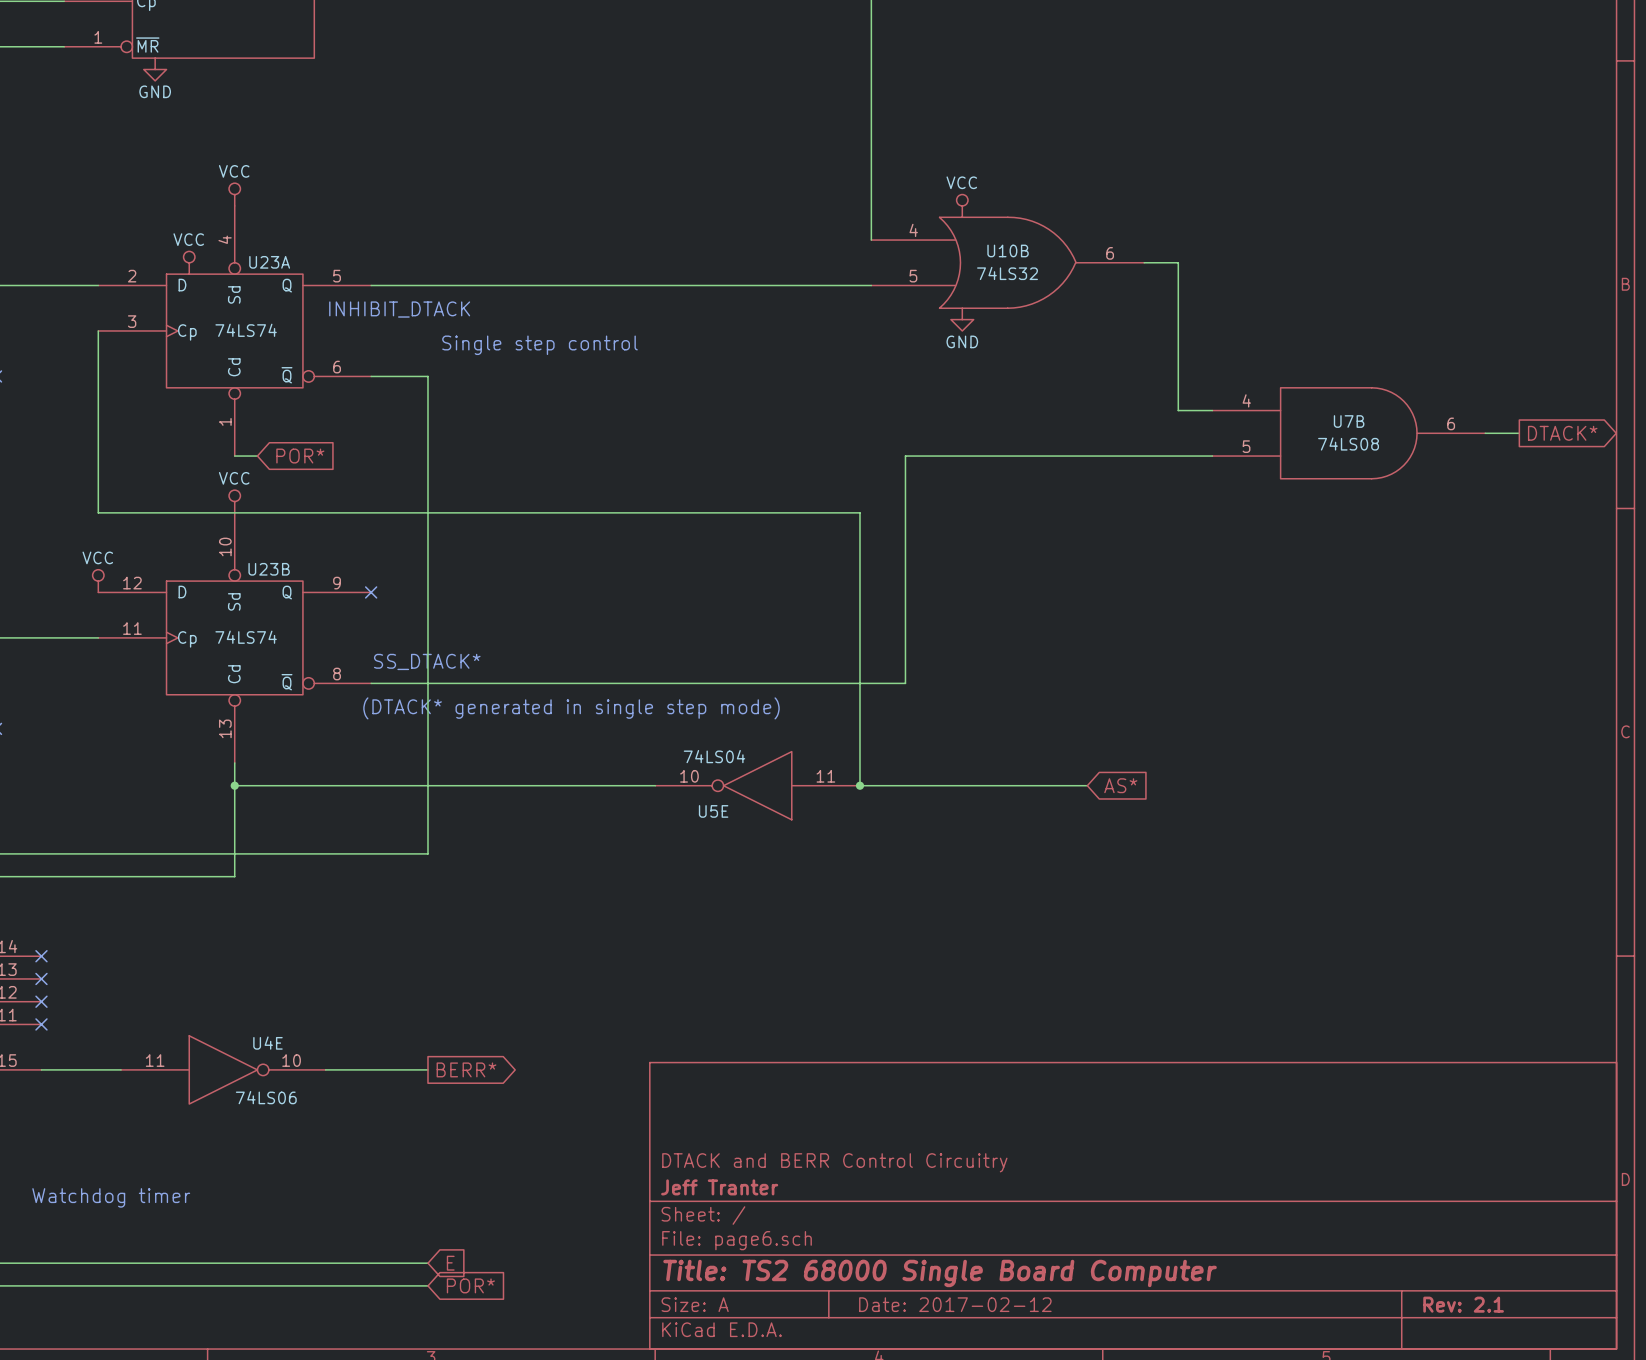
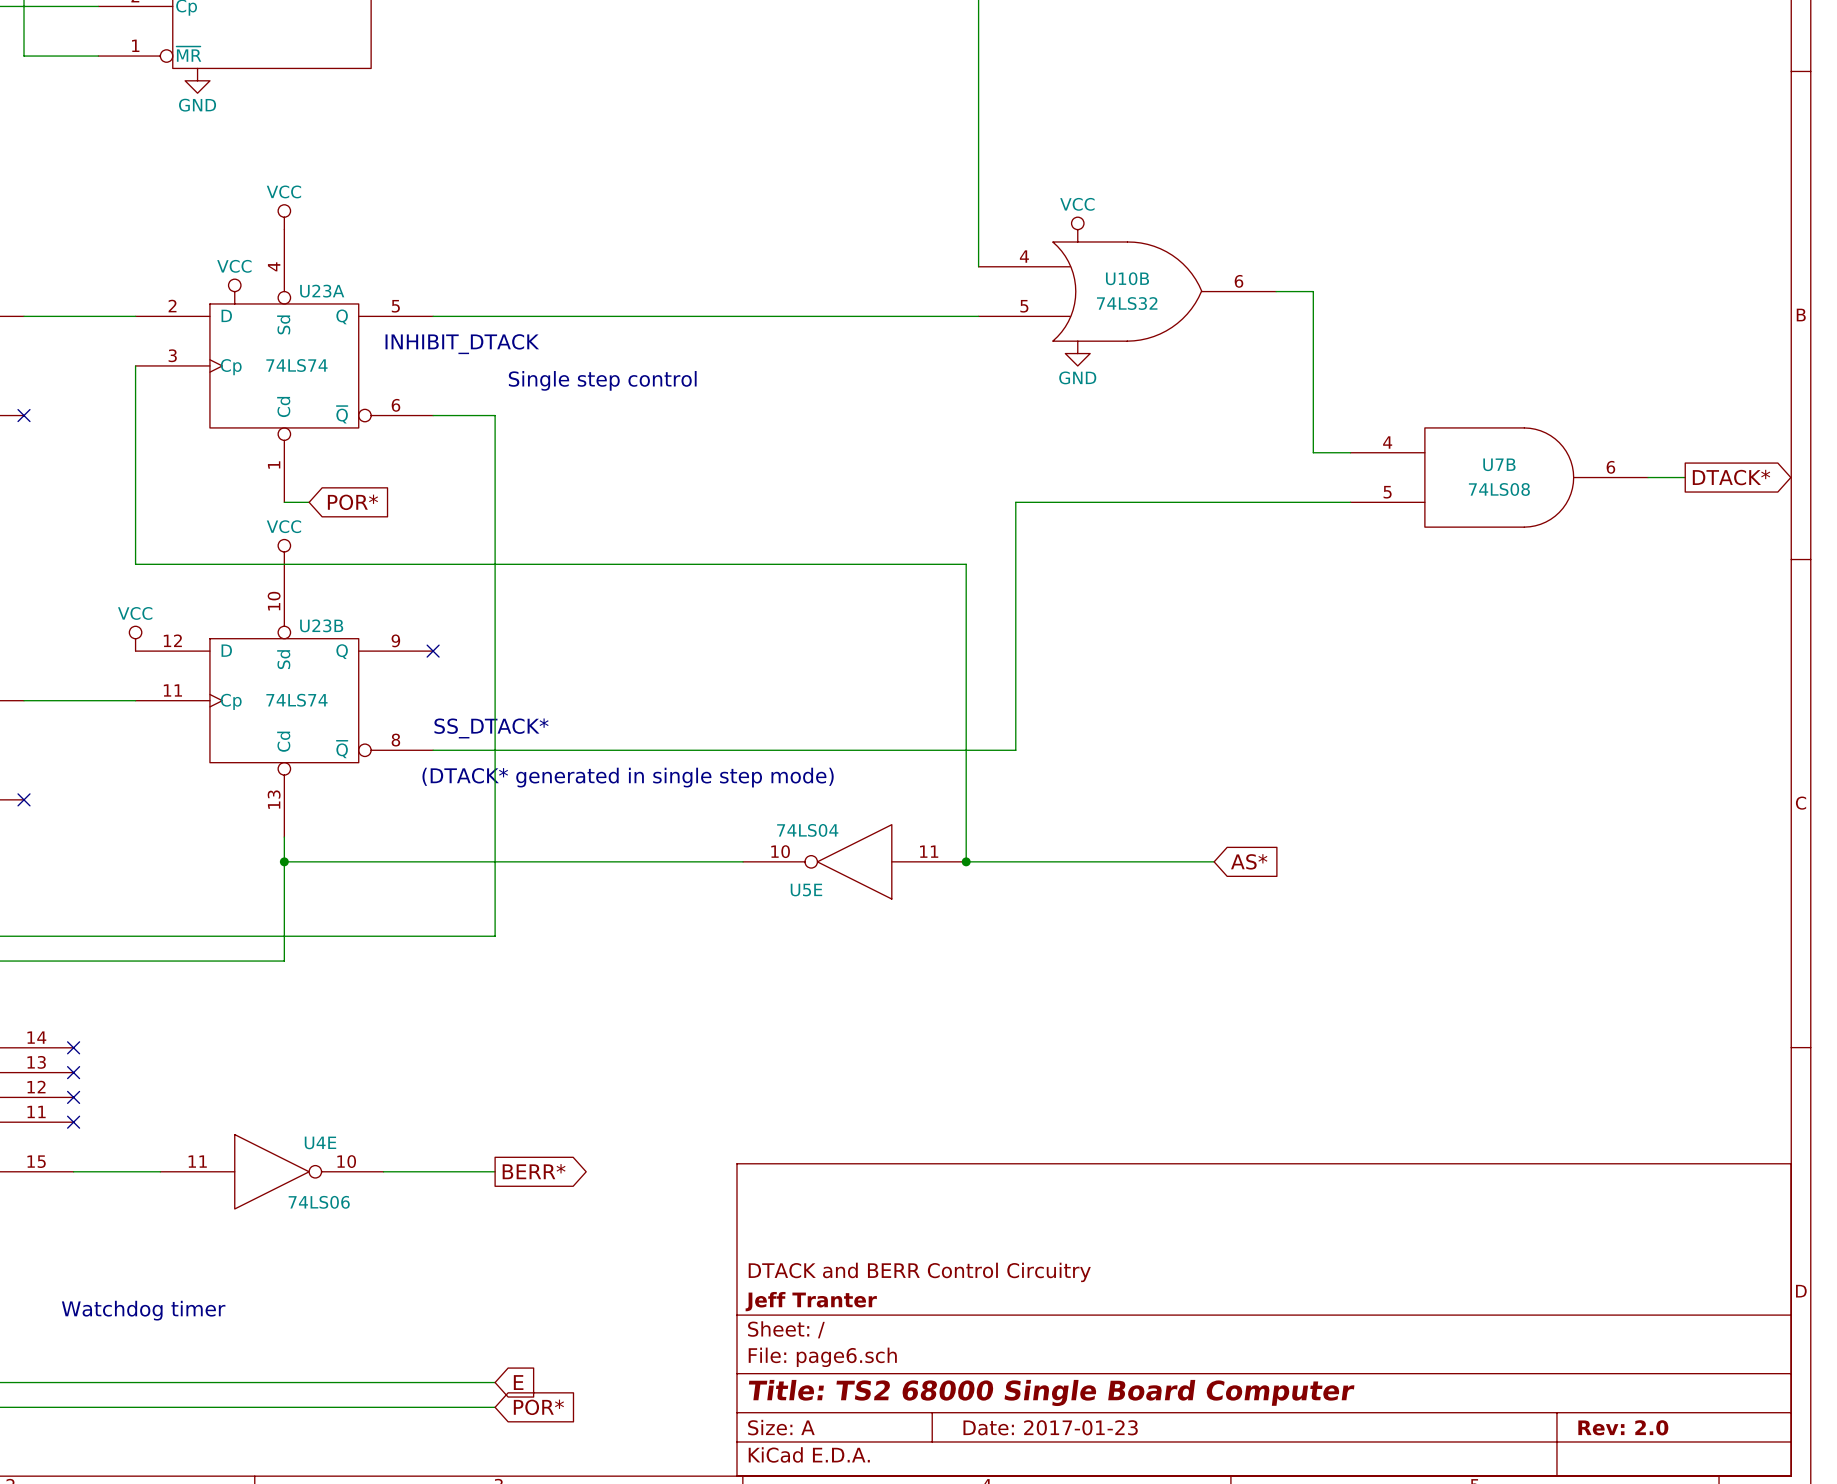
title block: Date: 2017-02-12 (955, 1304) -> Date: 2017-01-23 (1050, 1427)
title block: Rev: 2.1 (1463, 1304) -> Rev: 2.0 (1623, 1427)

